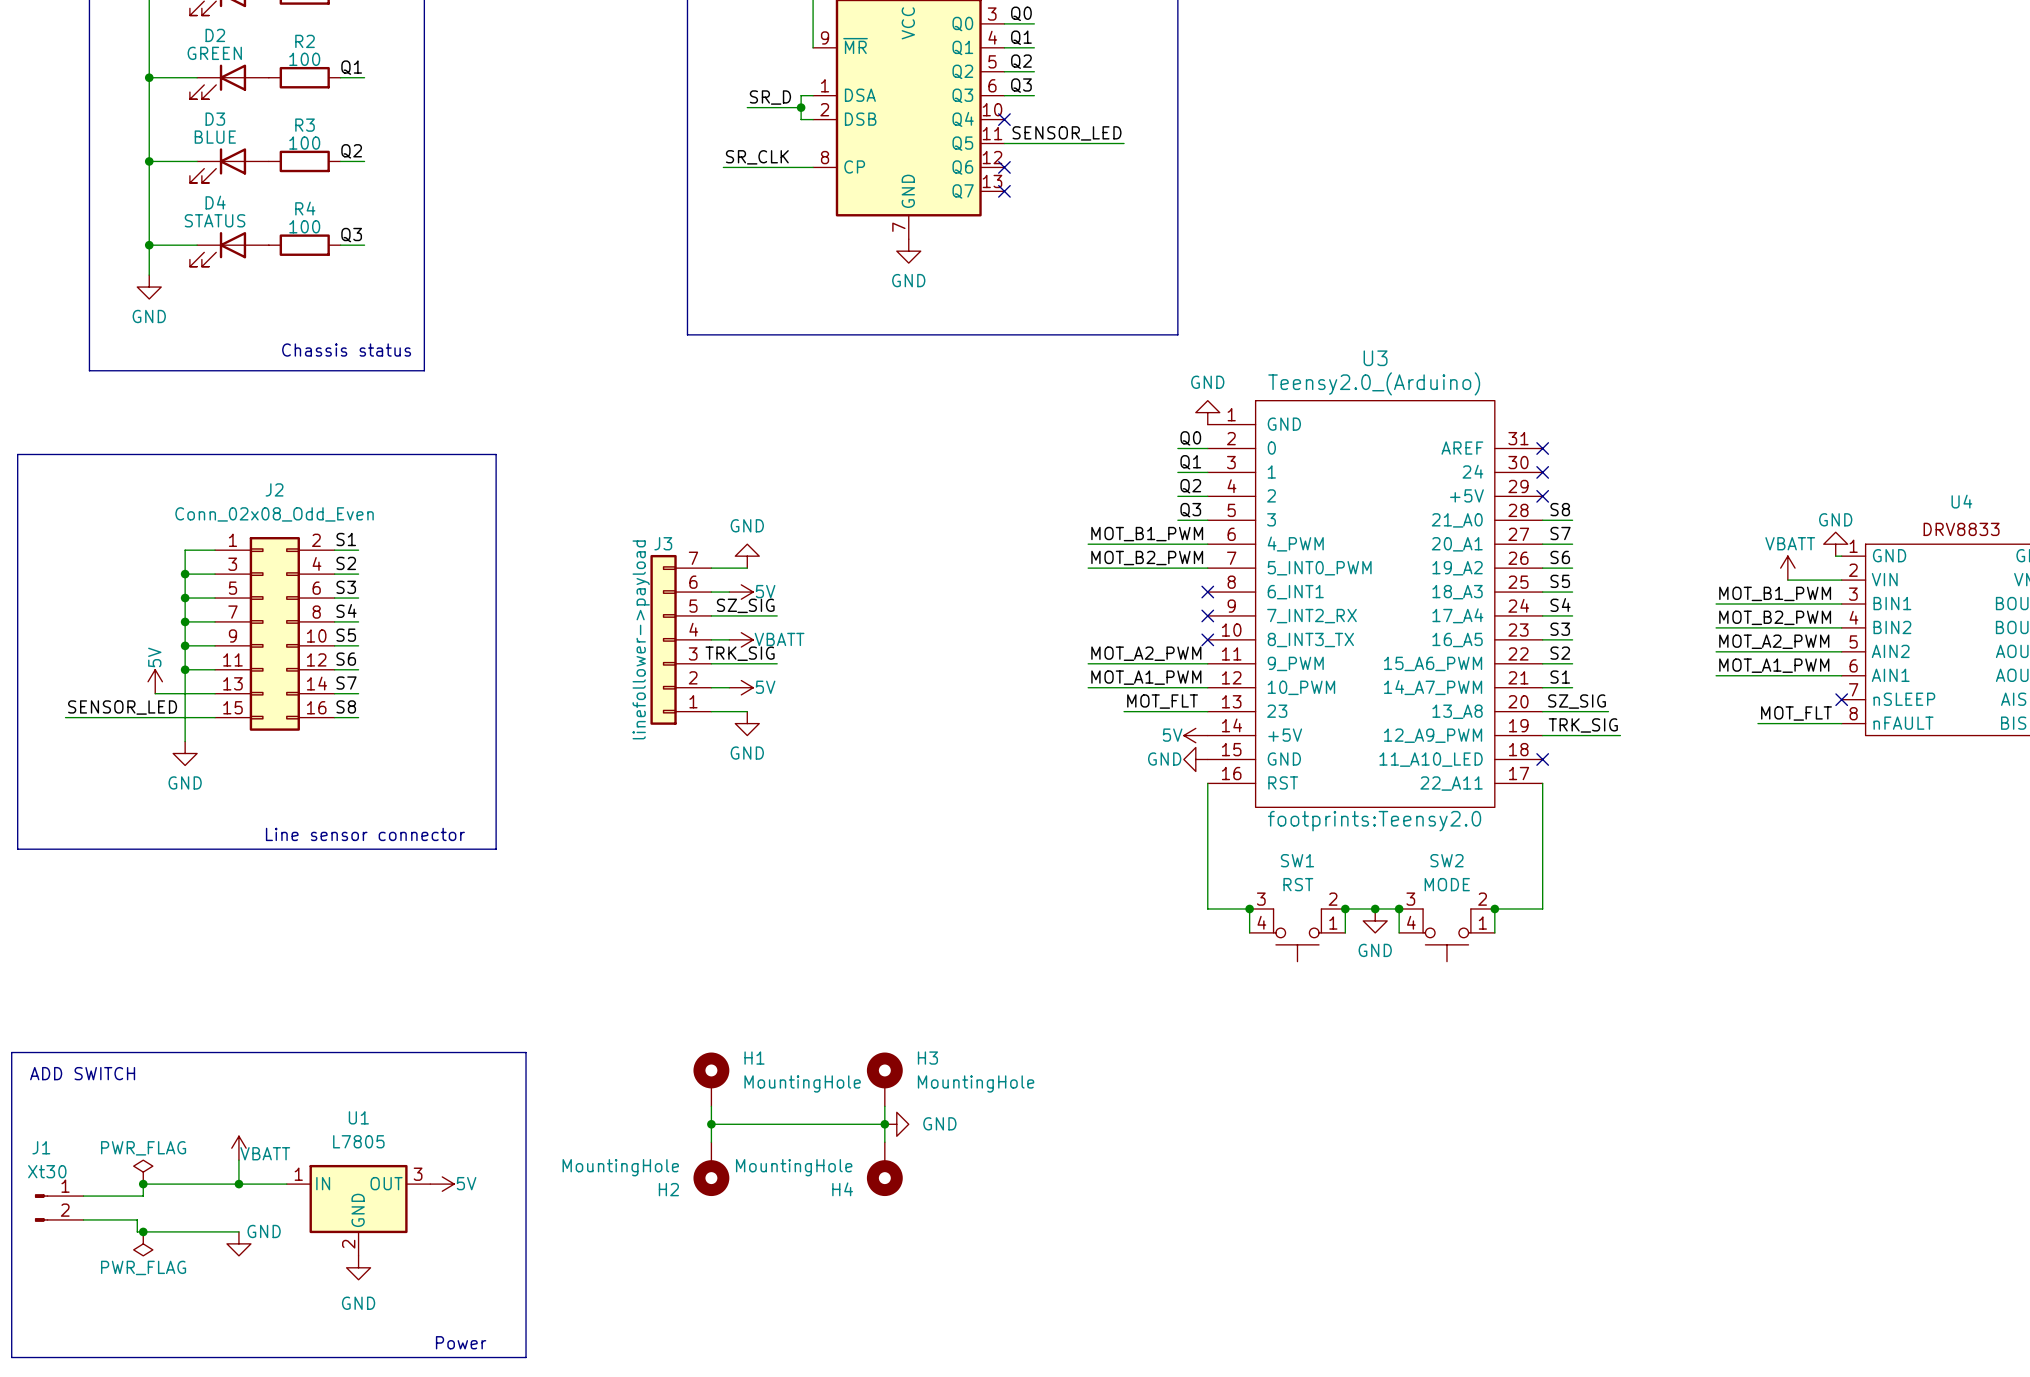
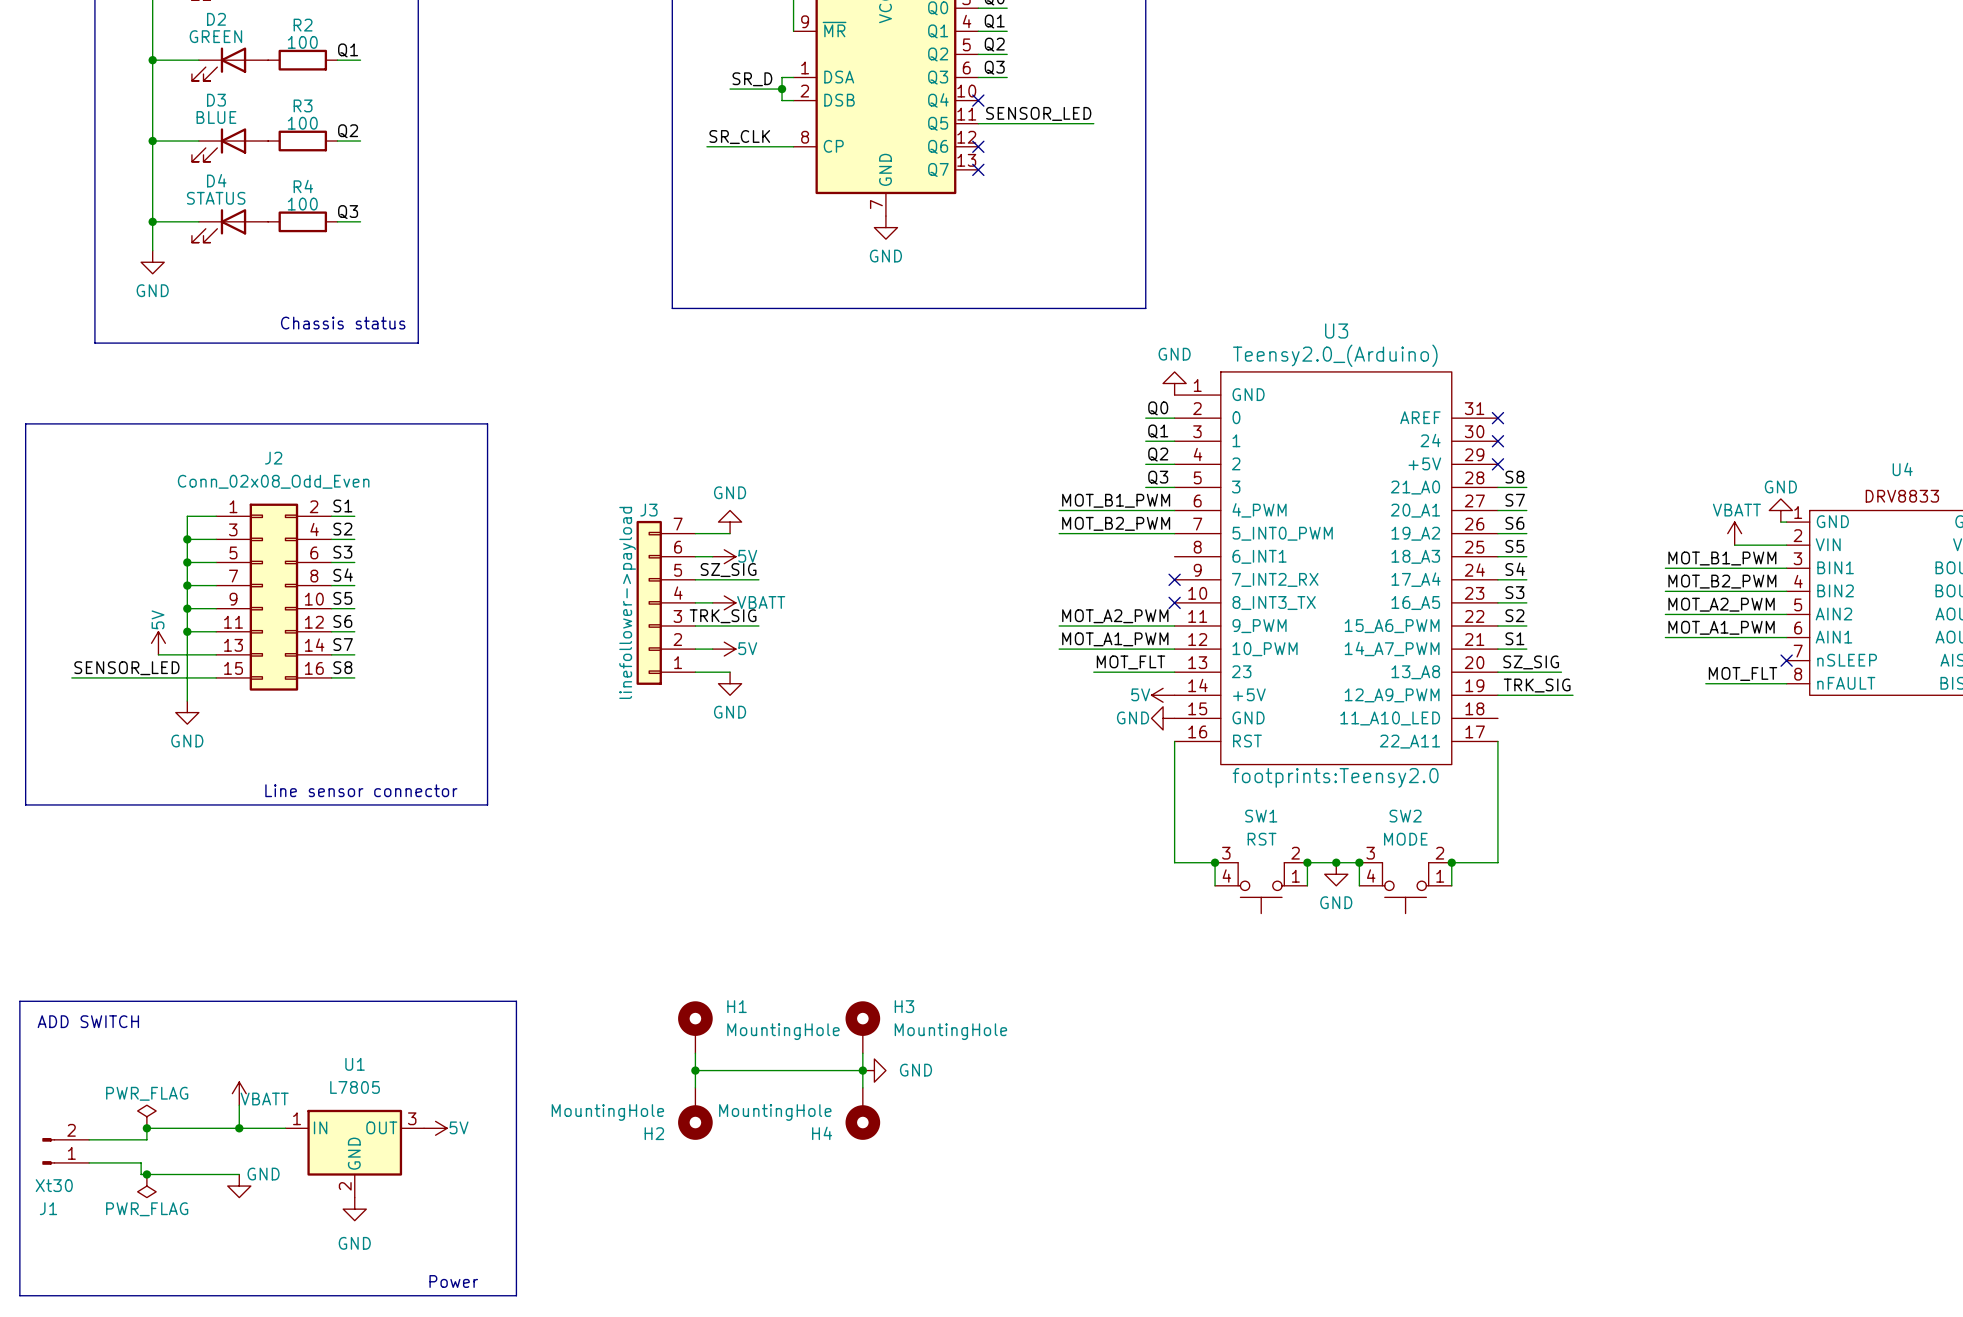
no-connect mark: (1207, 592) -> none
no-connect mark: (1542, 759) -> none
J1 flip: as is (41, 1208) -> up-down (48, 1151)

